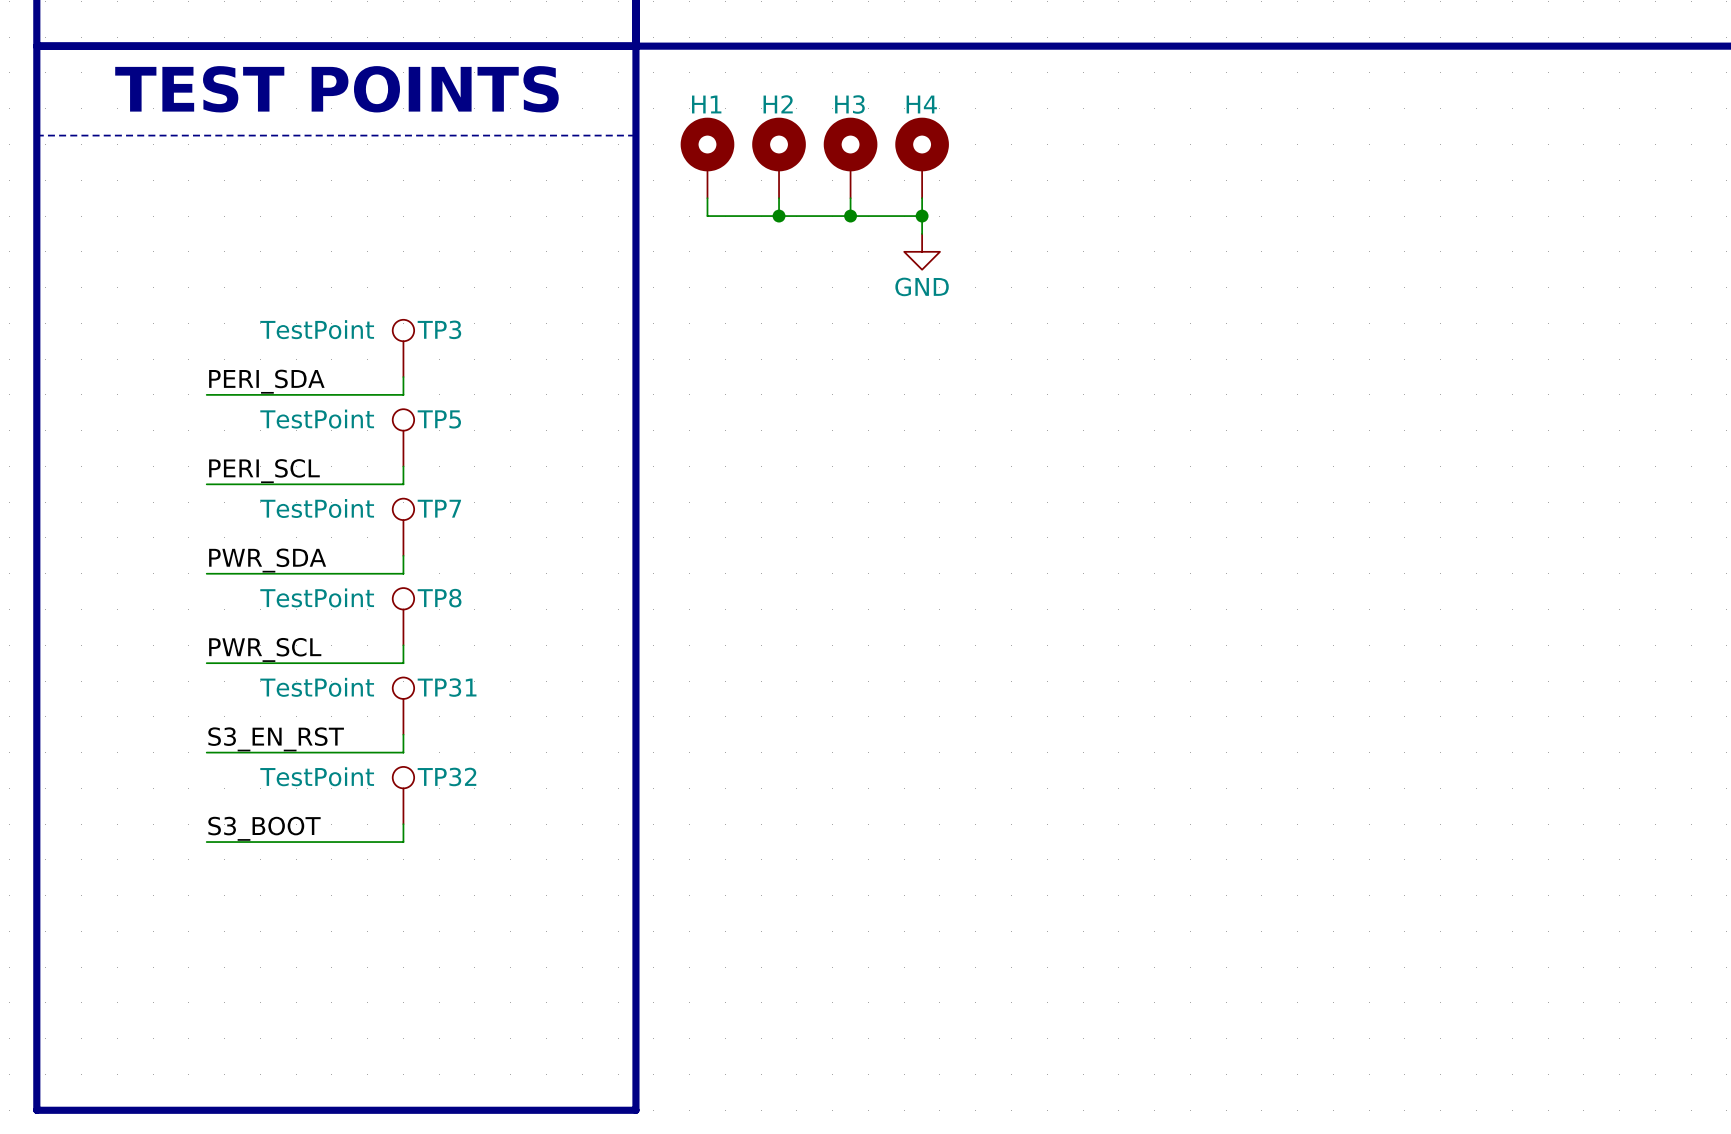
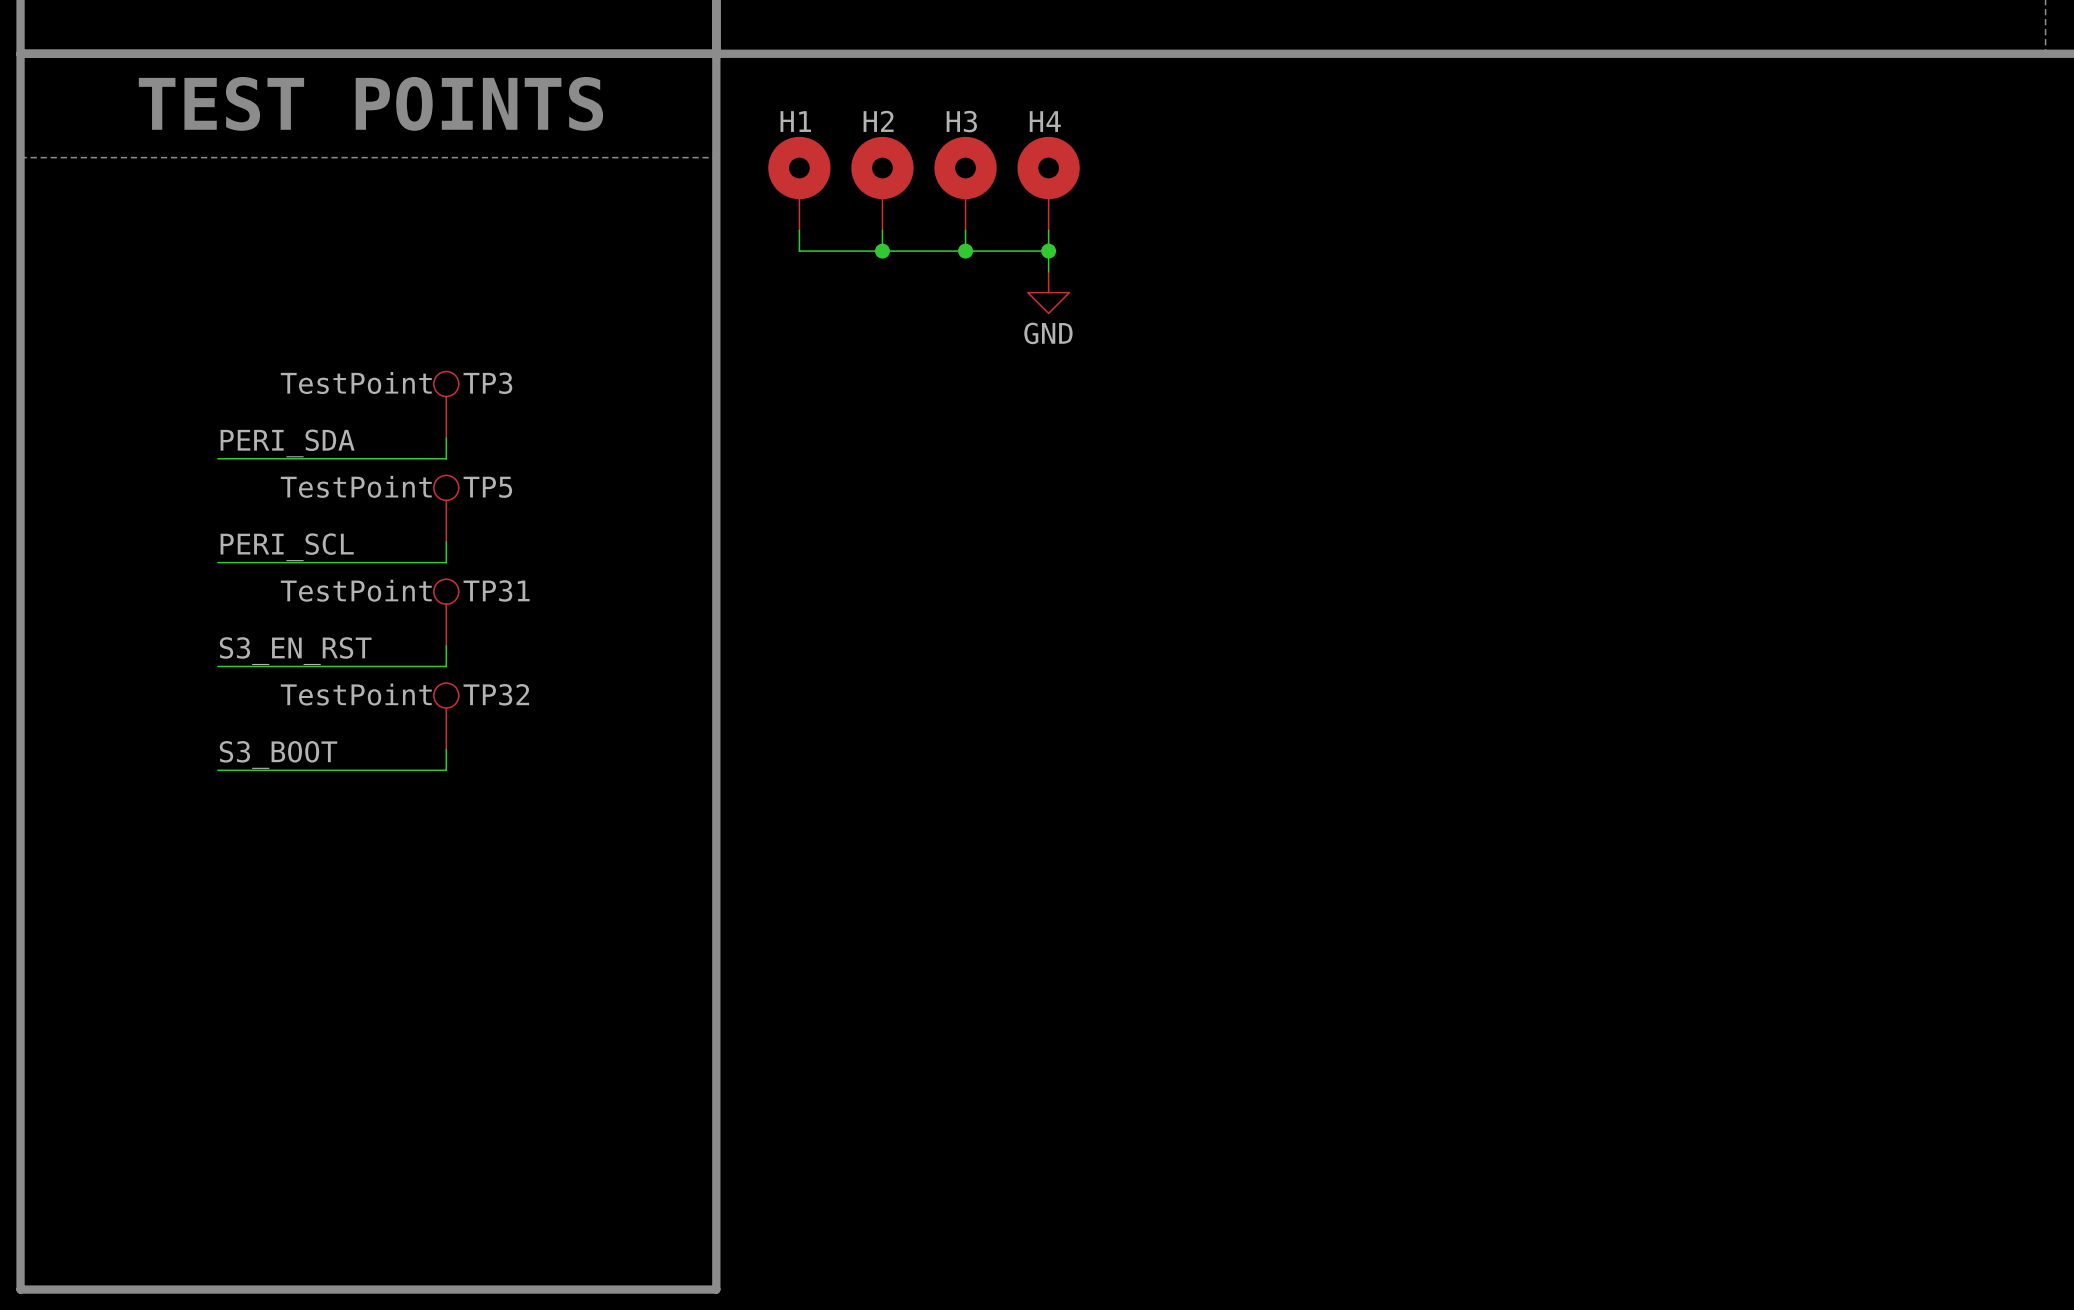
TP7 name: TP7 (439, 508) -> TP31 (496, 590)
label: PWR_SDA (267, 560) -> S3_EN_RST (295, 651)
TP8 name: TP8 (439, 598) -> TP32 (496, 694)
label: PWR_SCL (265, 649) -> S3_BOOT (278, 754)
TP31: TestPoint (403, 706) -> none
wire: (403, 734) (403, 752) (206, 752) -> none
label: S3_EN_RST (276, 739) -> none
TP32: TestPoint (403, 795) -> none
wire: (403, 824) (403, 842) (206, 842) -> none
label: S3_BOOT (264, 828) -> none

